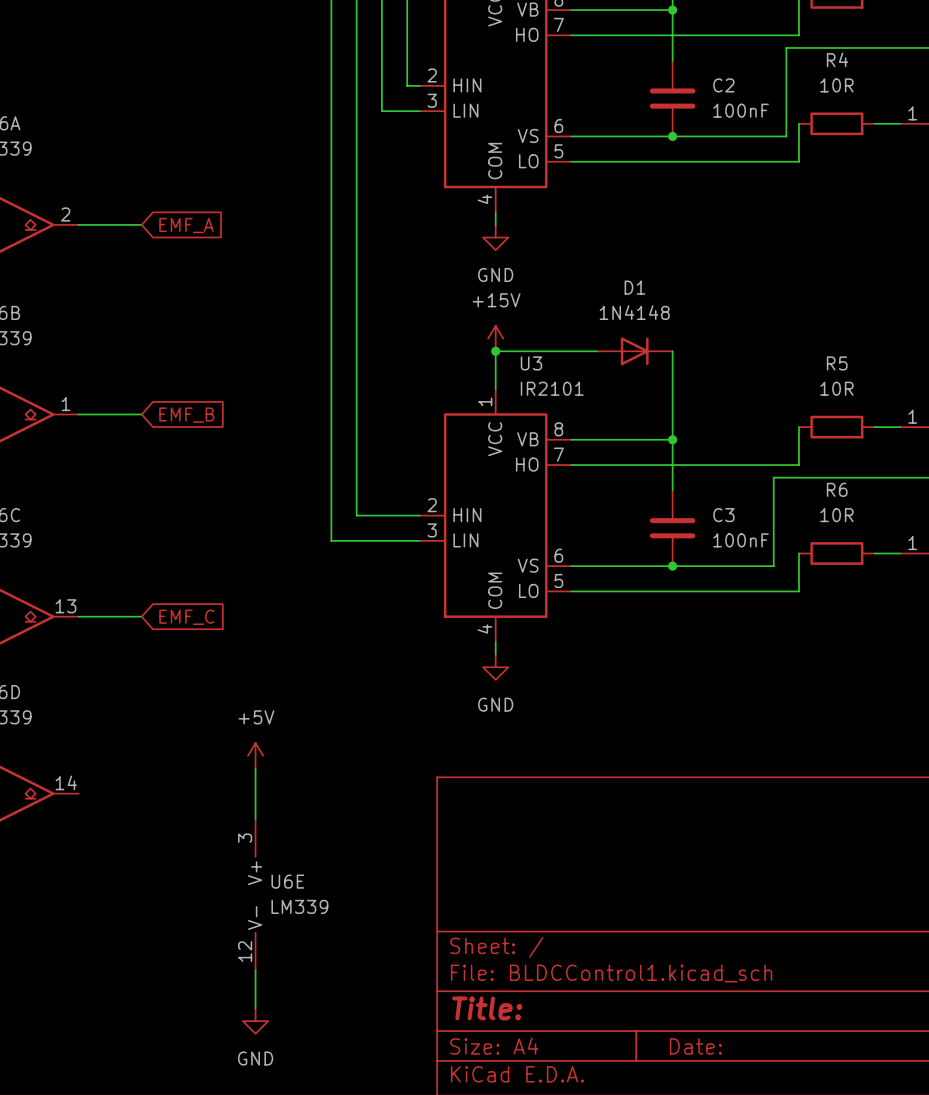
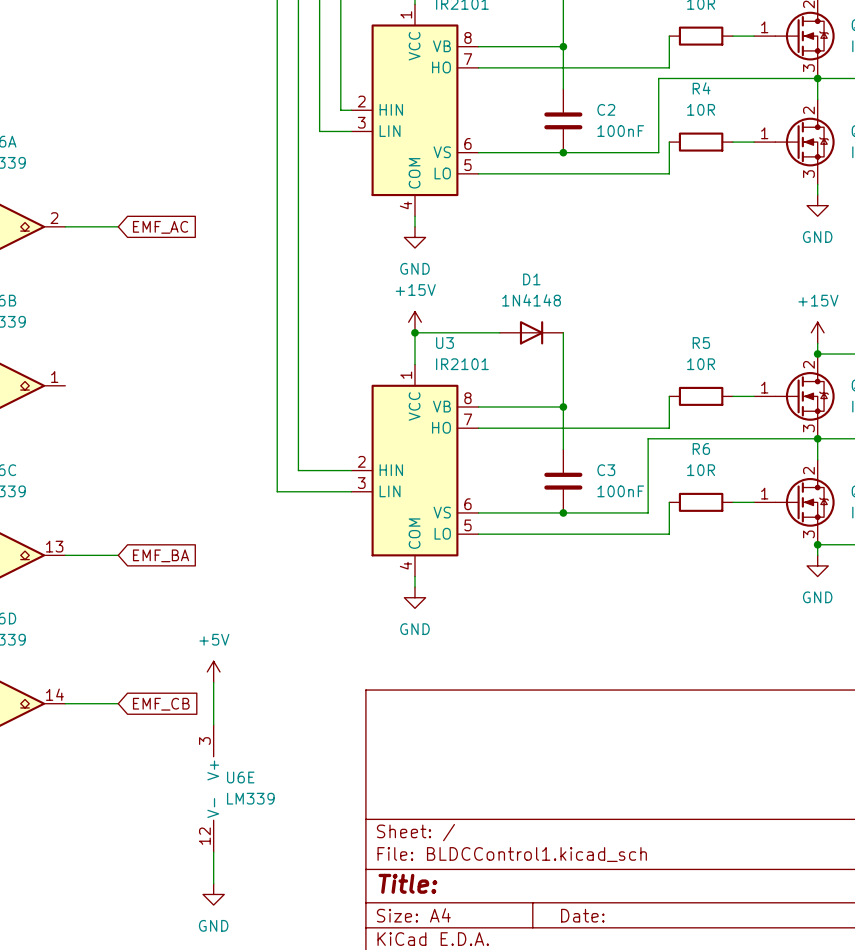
global label: EMF_A (186, 225) -> EMF_AC (160, 227)
wire: (78, 414) (141, 414) -> none
global label: EMF_B (186, 415) -> none
global label: EMF_C (186, 617) -> EMF_BA (161, 555)
wire: none -> (65, 703) (118, 703)
global label: none -> EMF_CB (161, 704)

